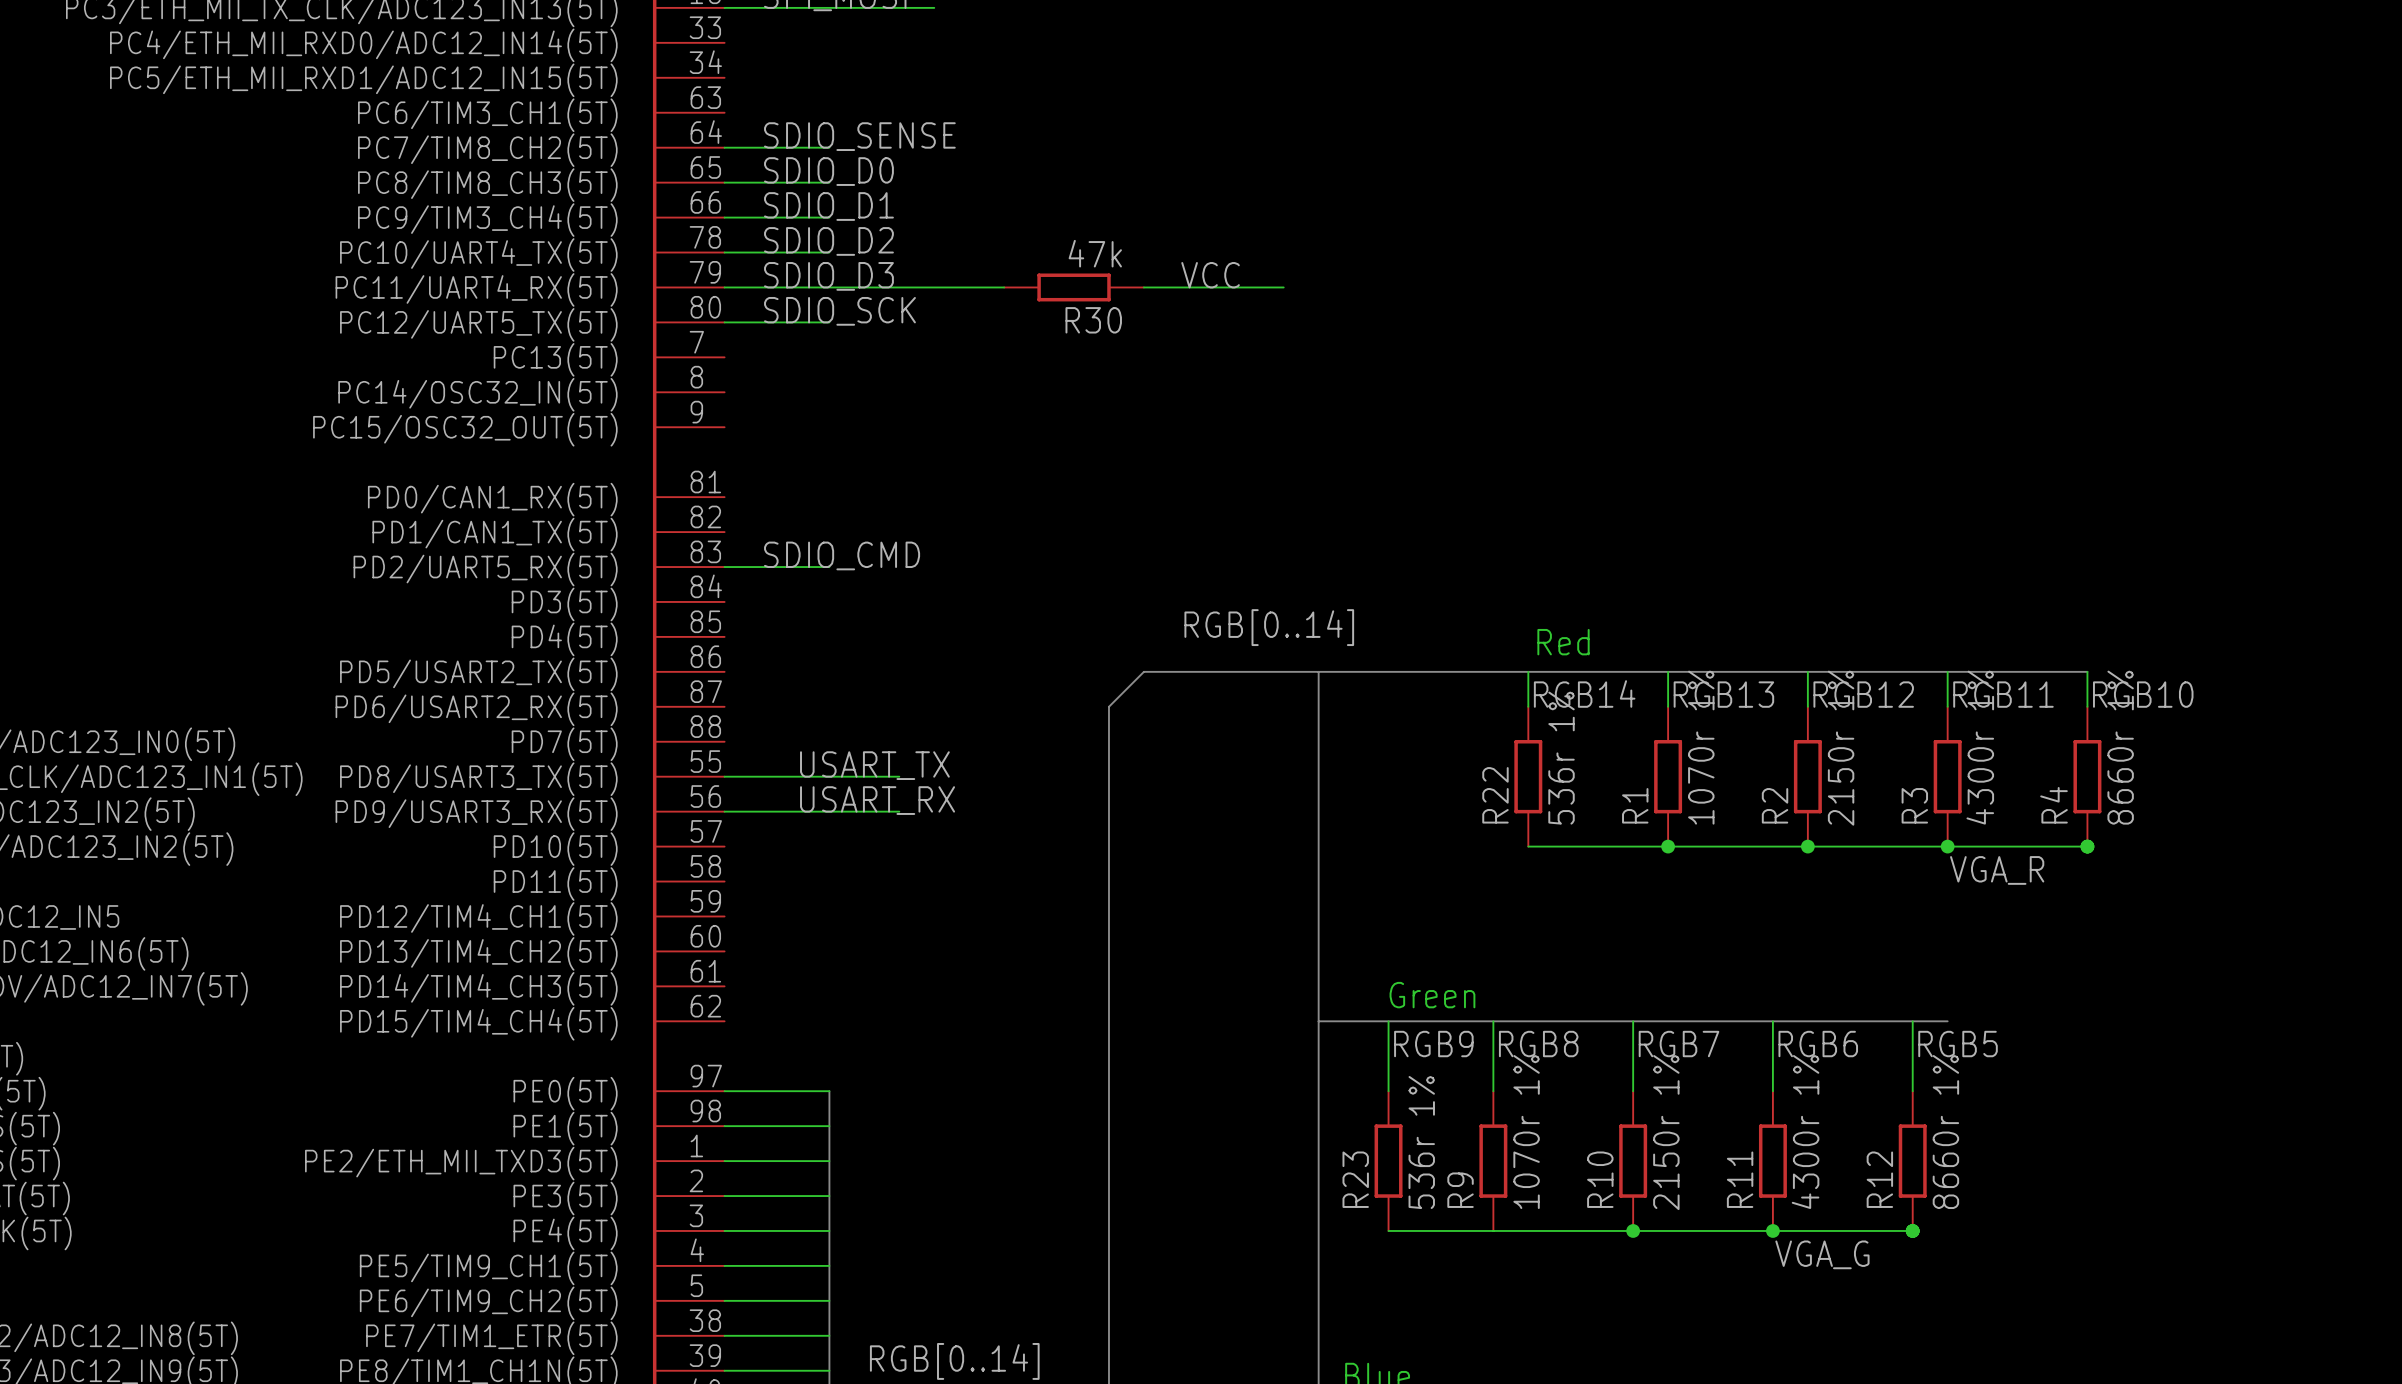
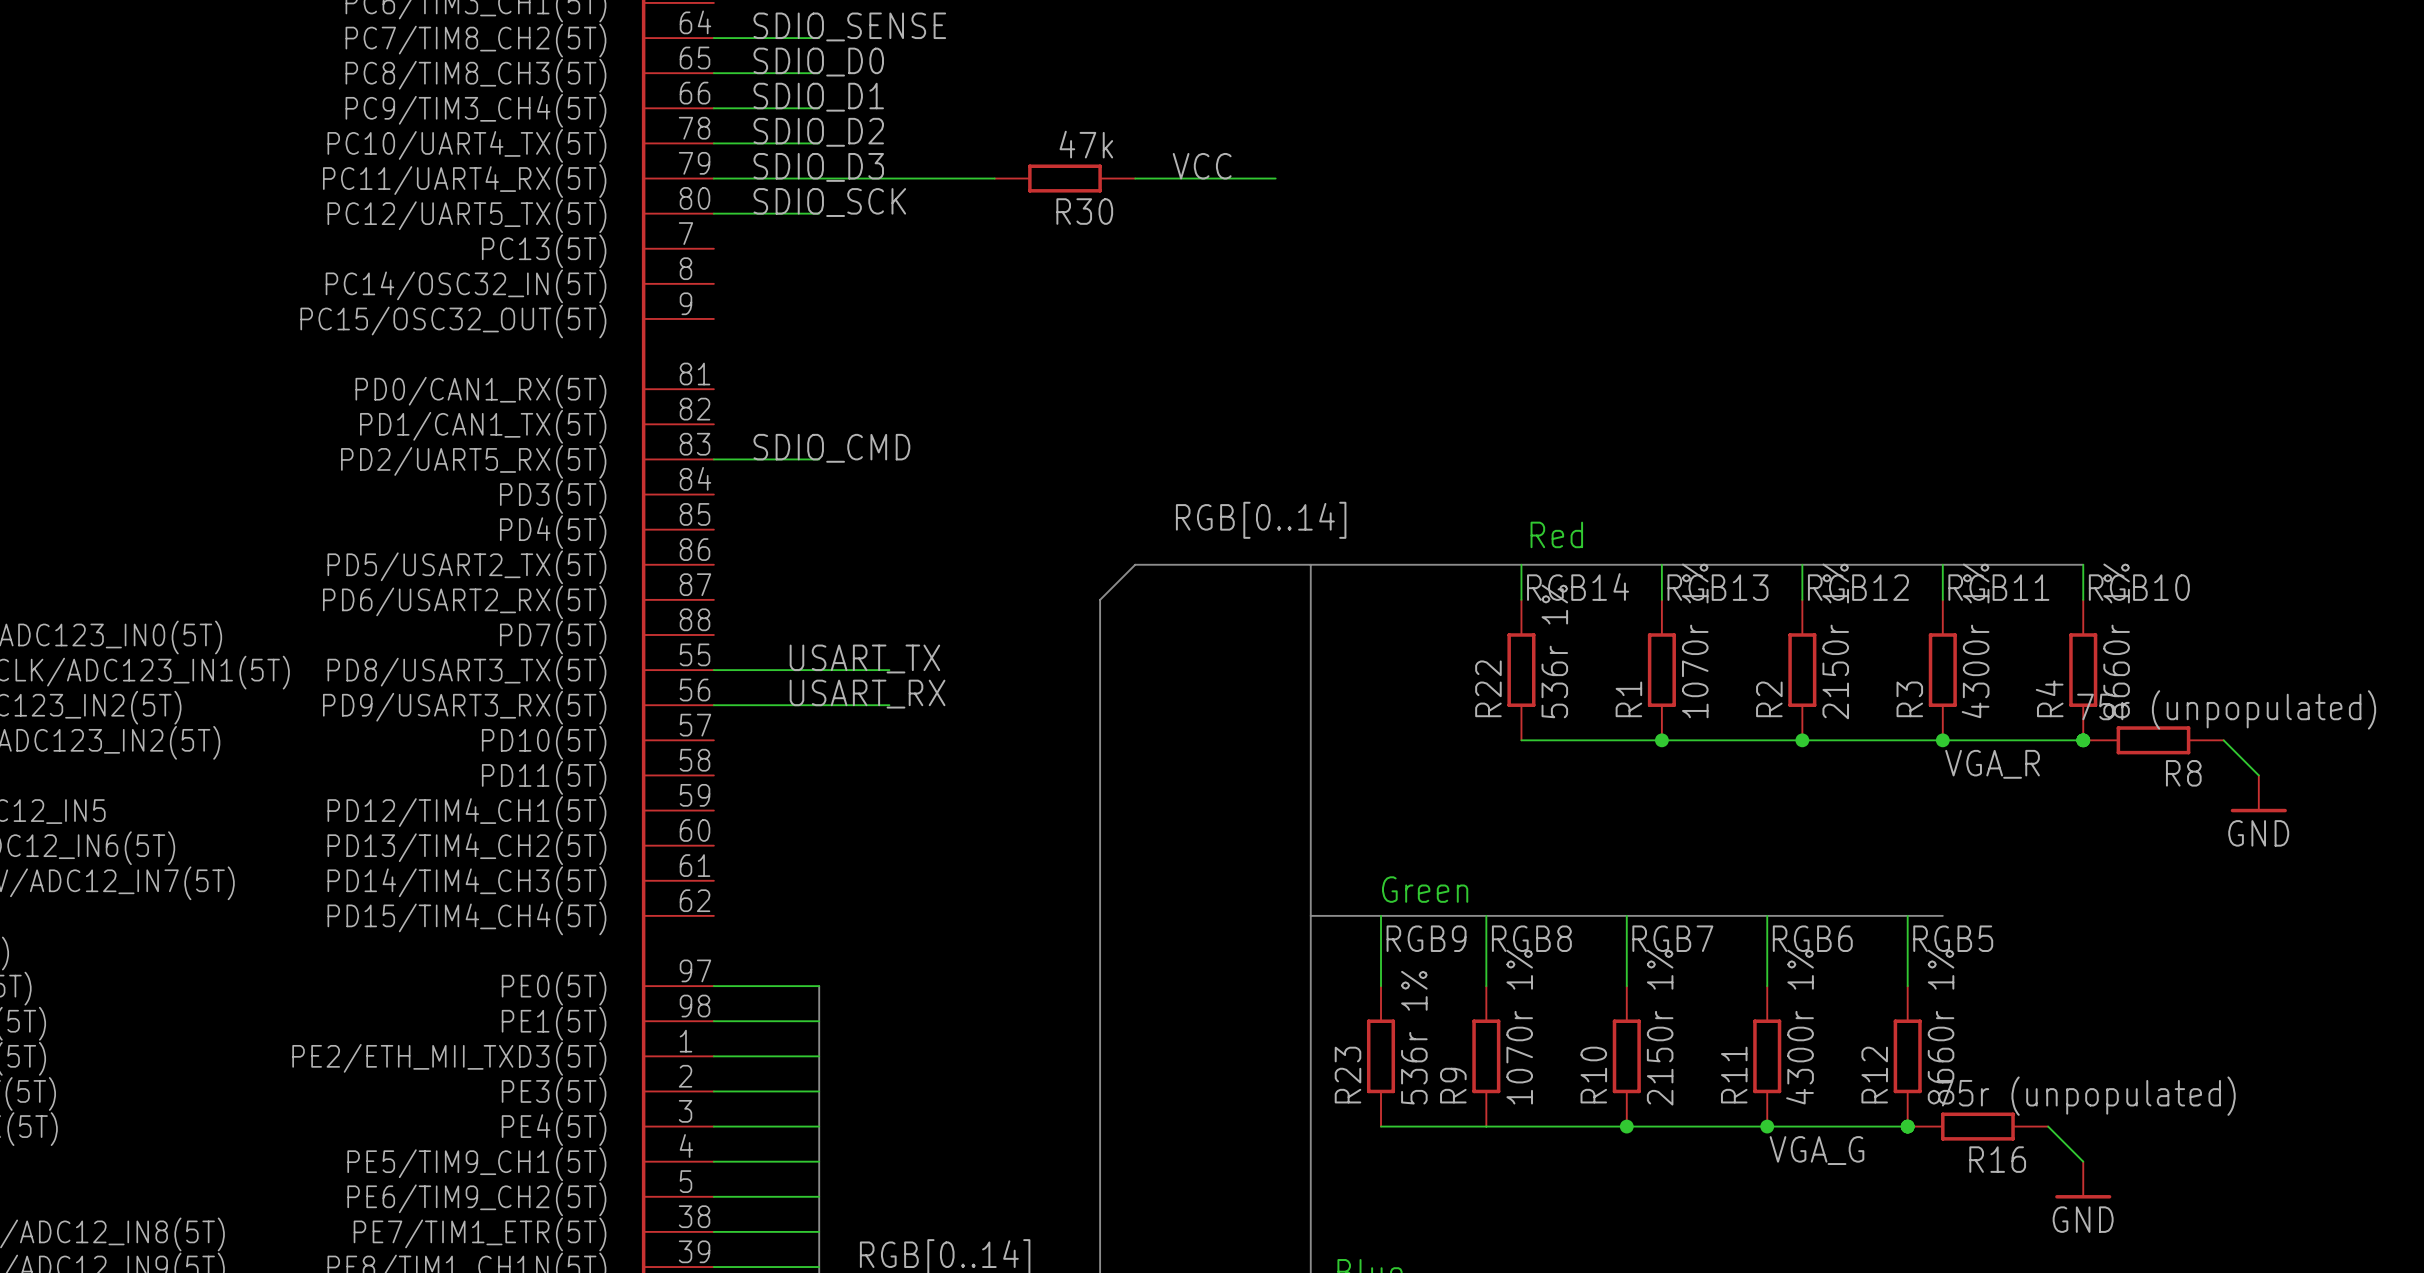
R8: none -> 75r (unpopulated) (2153, 740)
wire: none -> (2223, 740) (2258, 775)
power symbol: none -> GND (2258, 793)
R16: none -> 75r (unpopulated) (1977, 1126)
wire: none -> (2048, 1126) (2083, 1161)
power symbol: none -> GND (2083, 1180)

